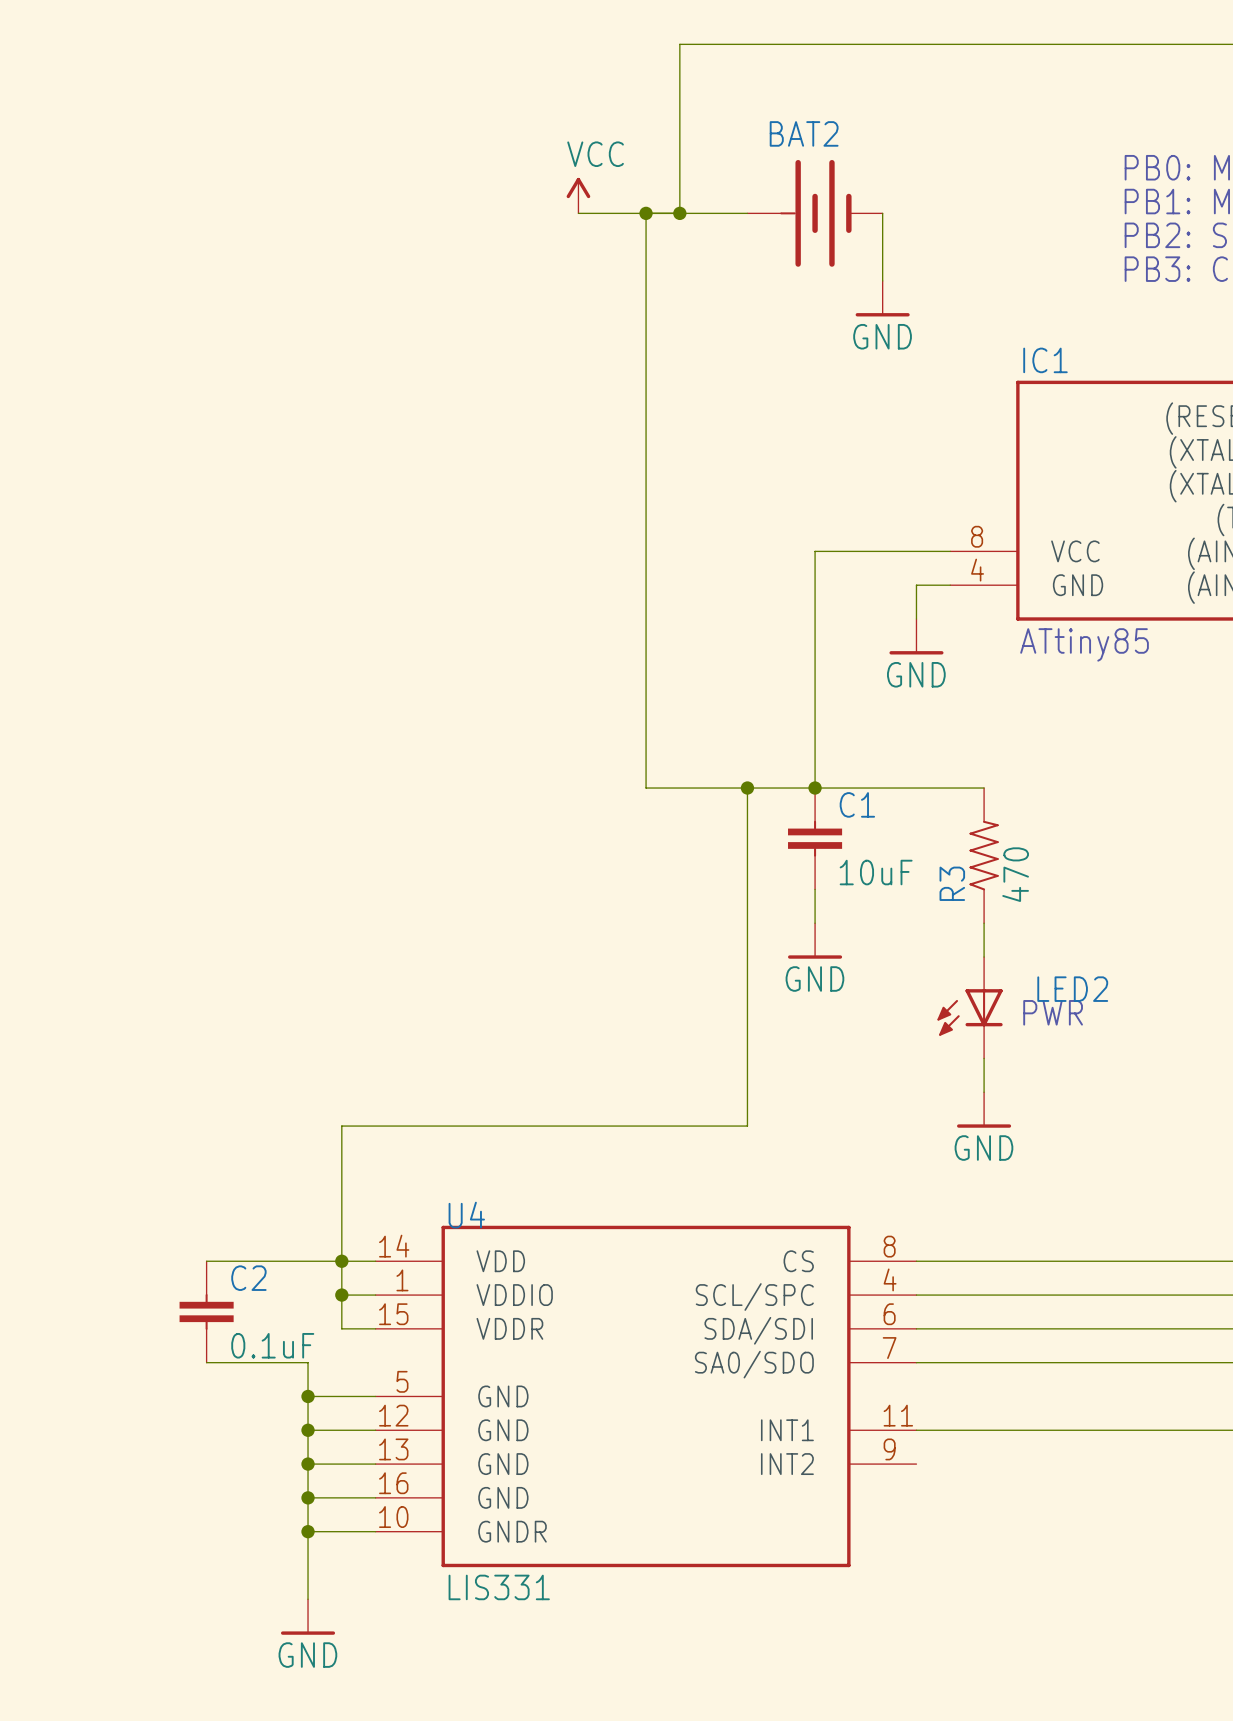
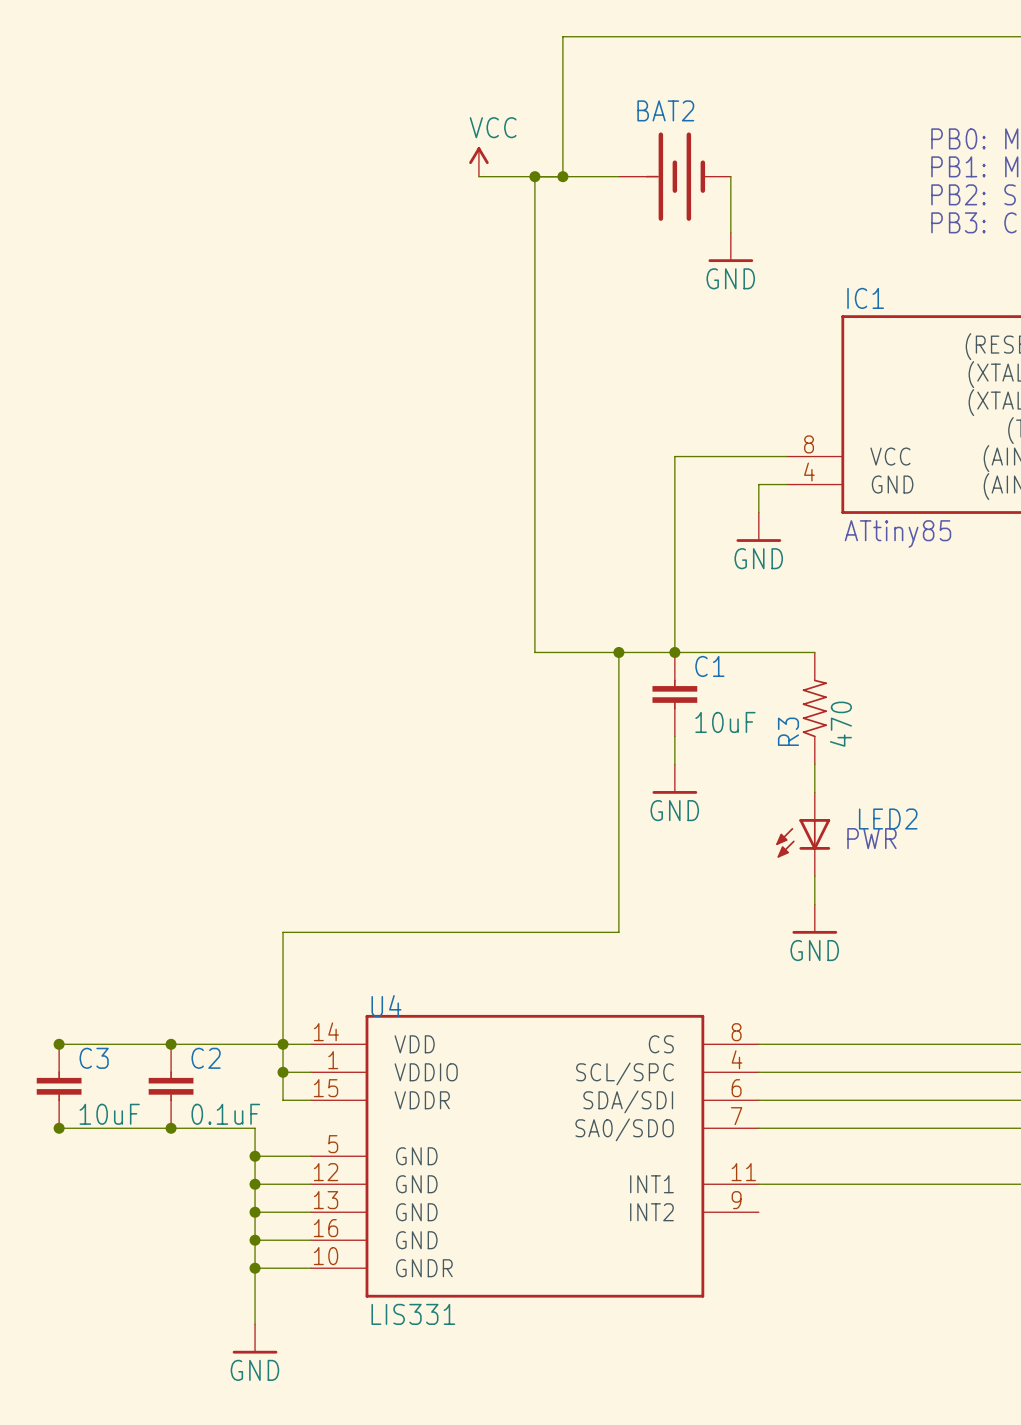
wire: none -> (59, 1044) (171, 1044)
junction: none -> (59, 1044)
junction: none -> (171, 1044)
C3: none -> 10uF (59, 1086)
wire: none -> (59, 1128) (171, 1128)
junction: none -> (59, 1128)
junction: none -> (171, 1128)

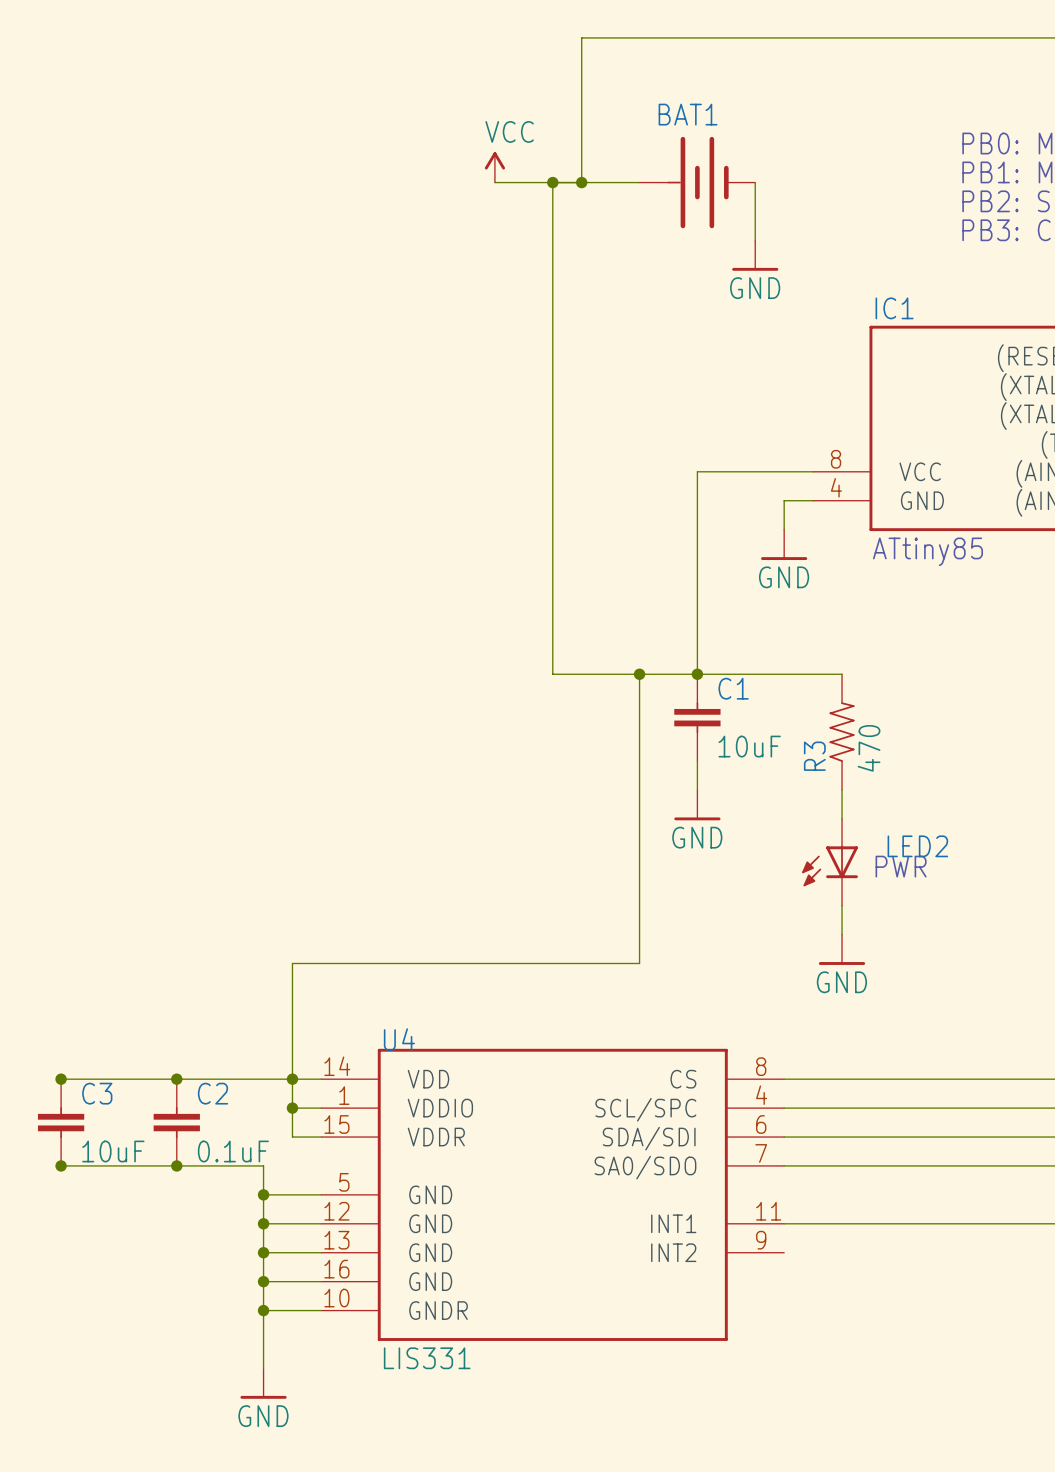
BAT2 name: BAT2 (665, 110) -> BAT1 (688, 114)

